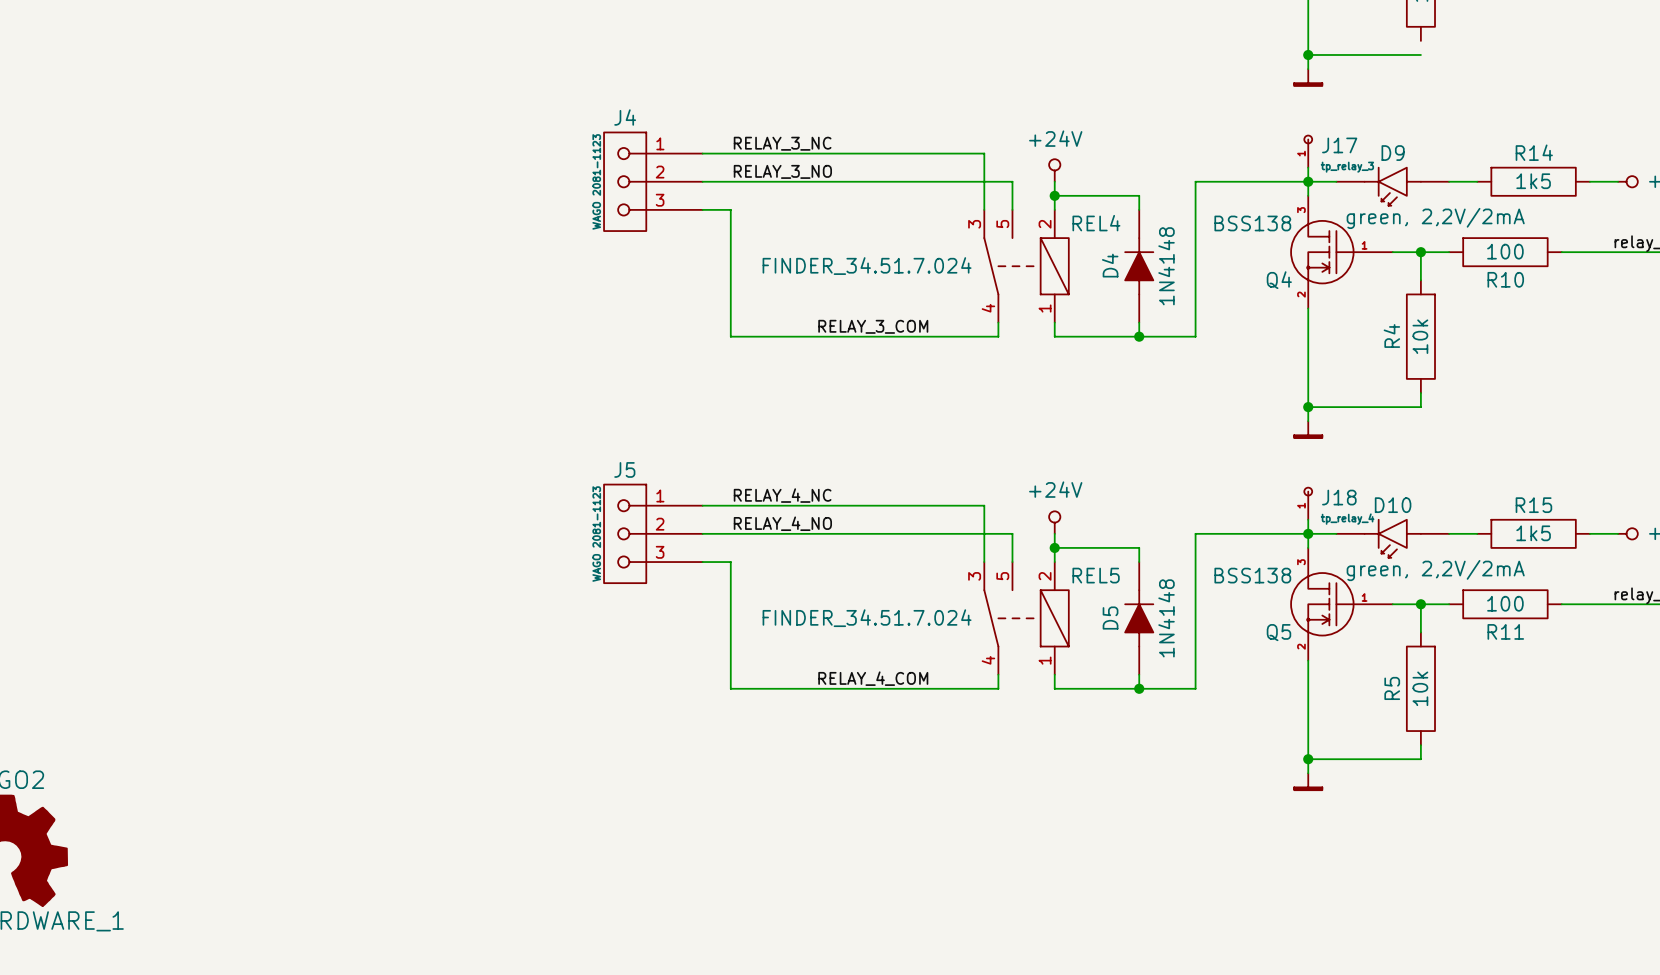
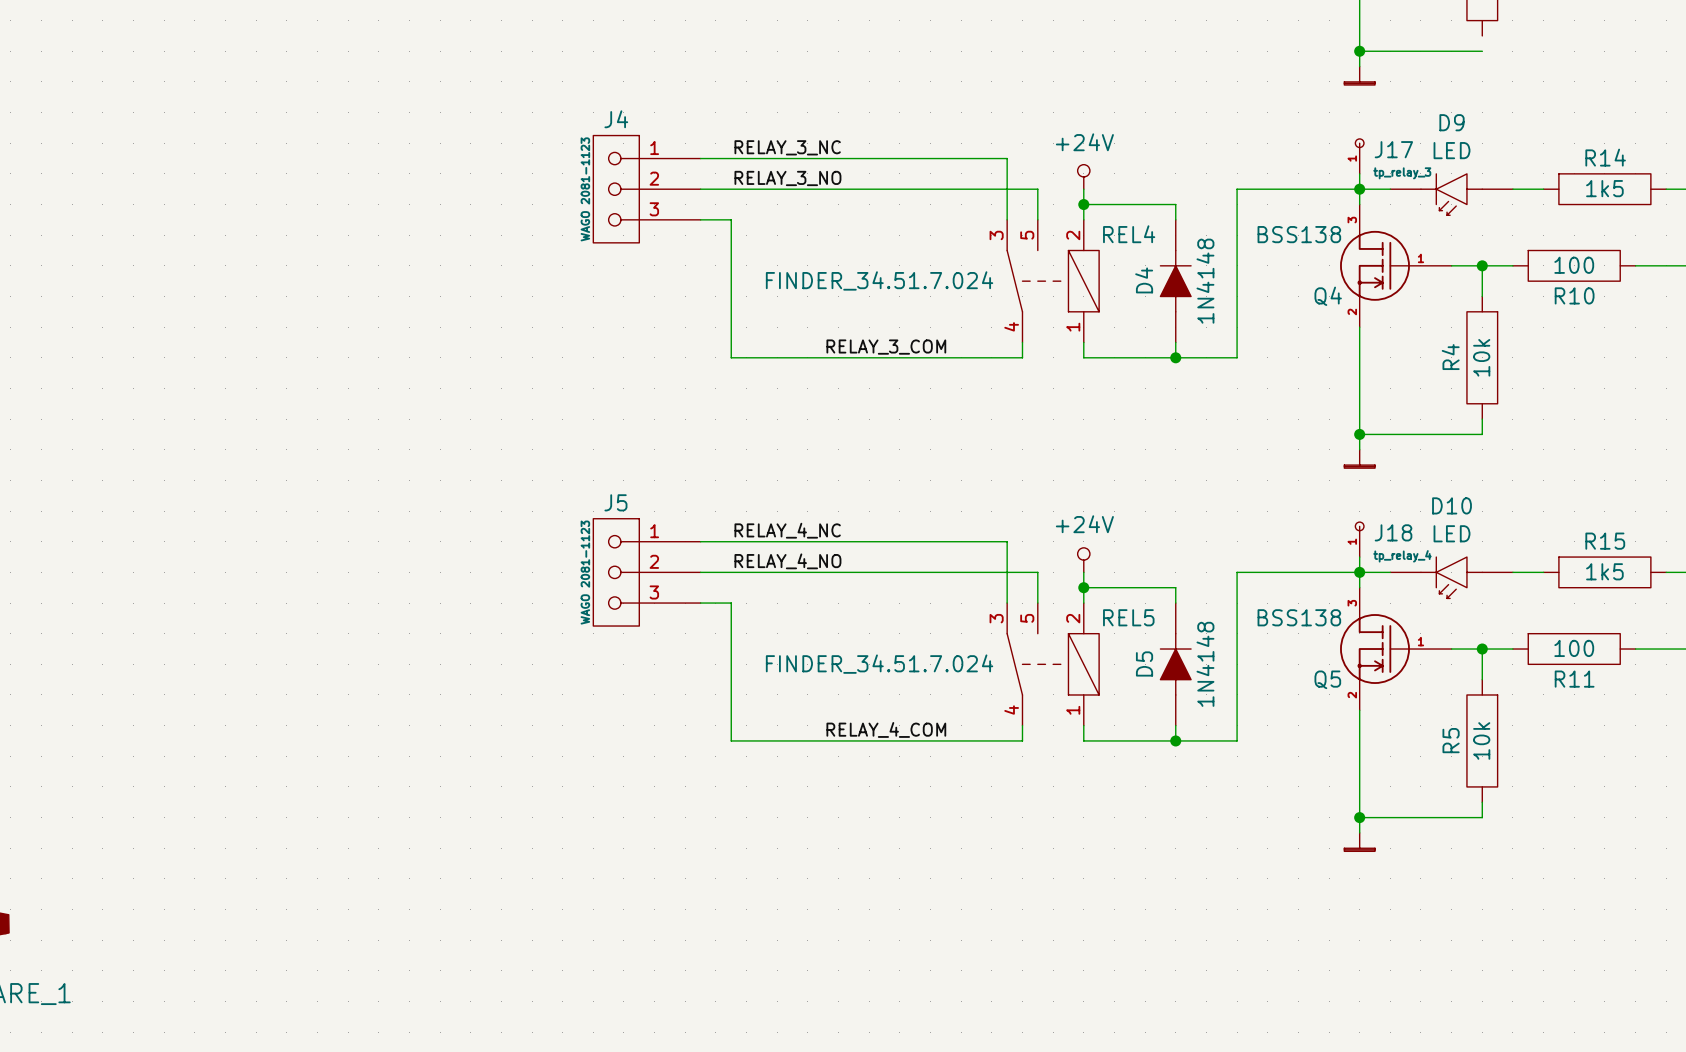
D9 name position: D9 (1393, 153) -> D9 (1452, 122)
D9 value: green, 2,2V/2mA (1435, 218) -> LED (1452, 150)
D10 name position: D10 (1393, 505) -> D10 (1452, 505)
D10 value: green, 2,2V/2mA (1435, 570) -> LED (1452, 533)

